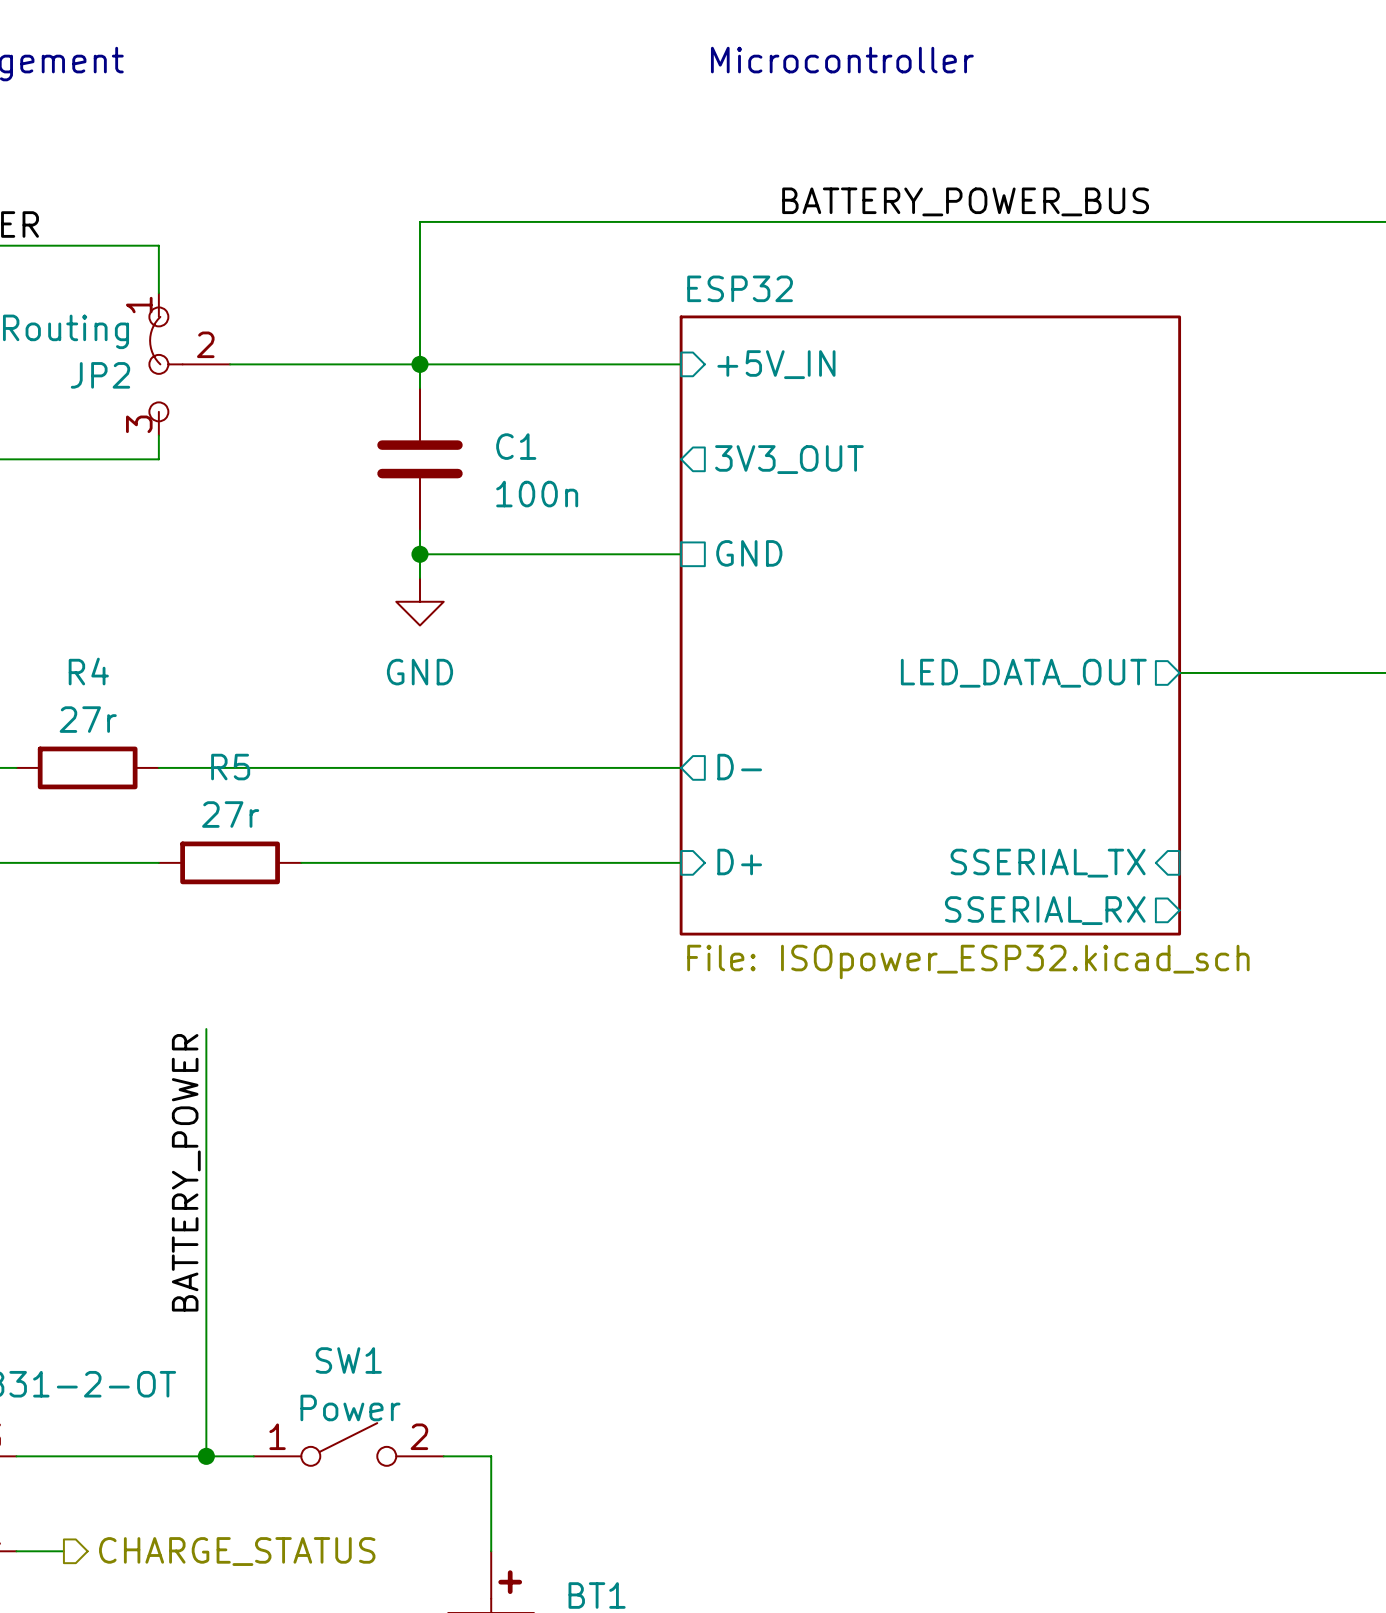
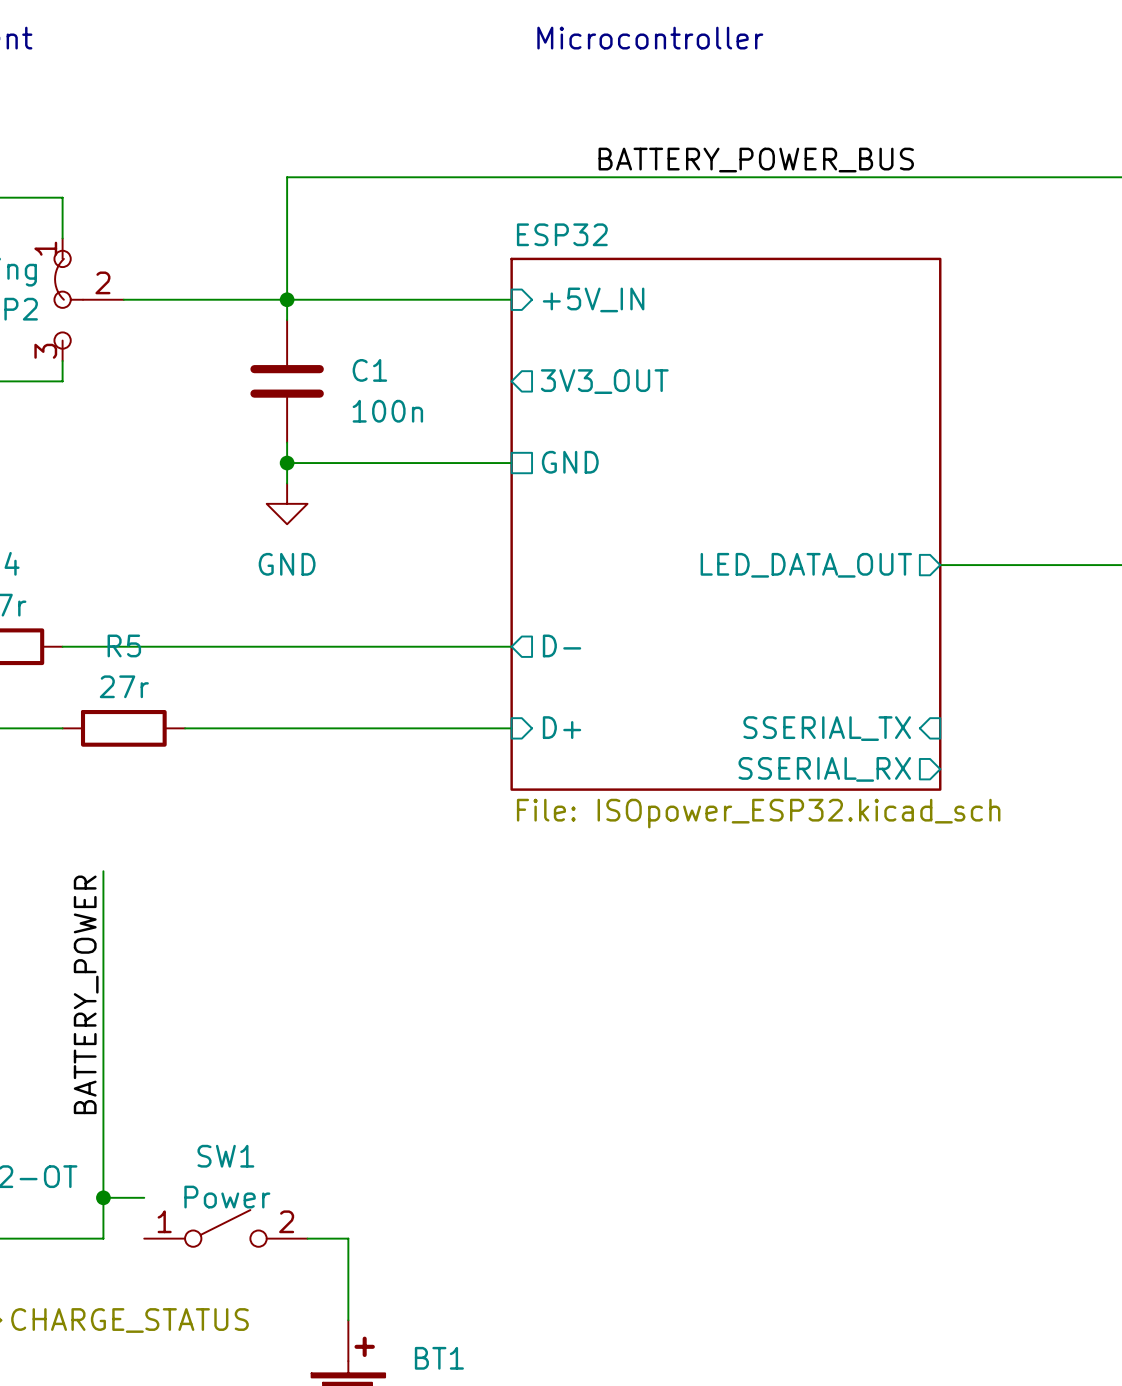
wire: (206, 1456) (253, 1456) -> (103, 1197) (144, 1197)
junction position: (206, 1456) -> (103, 1197)

